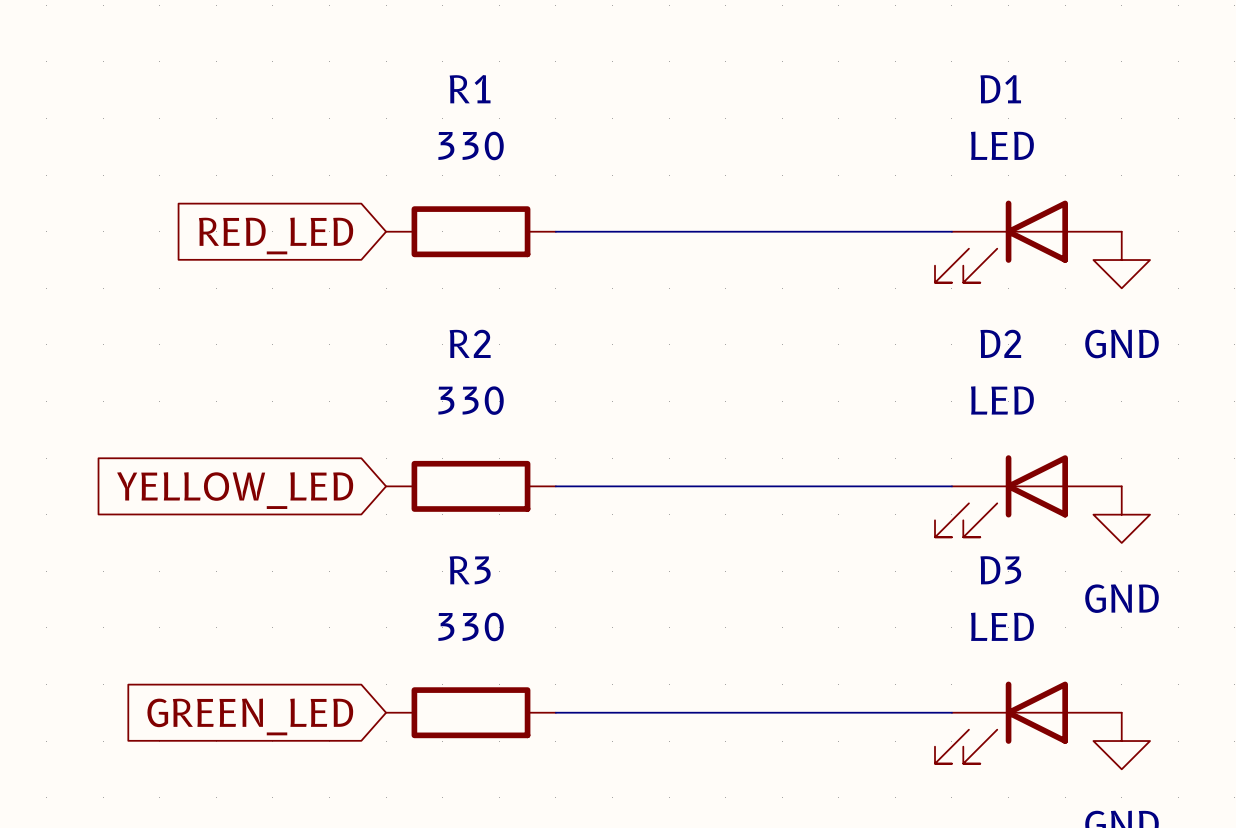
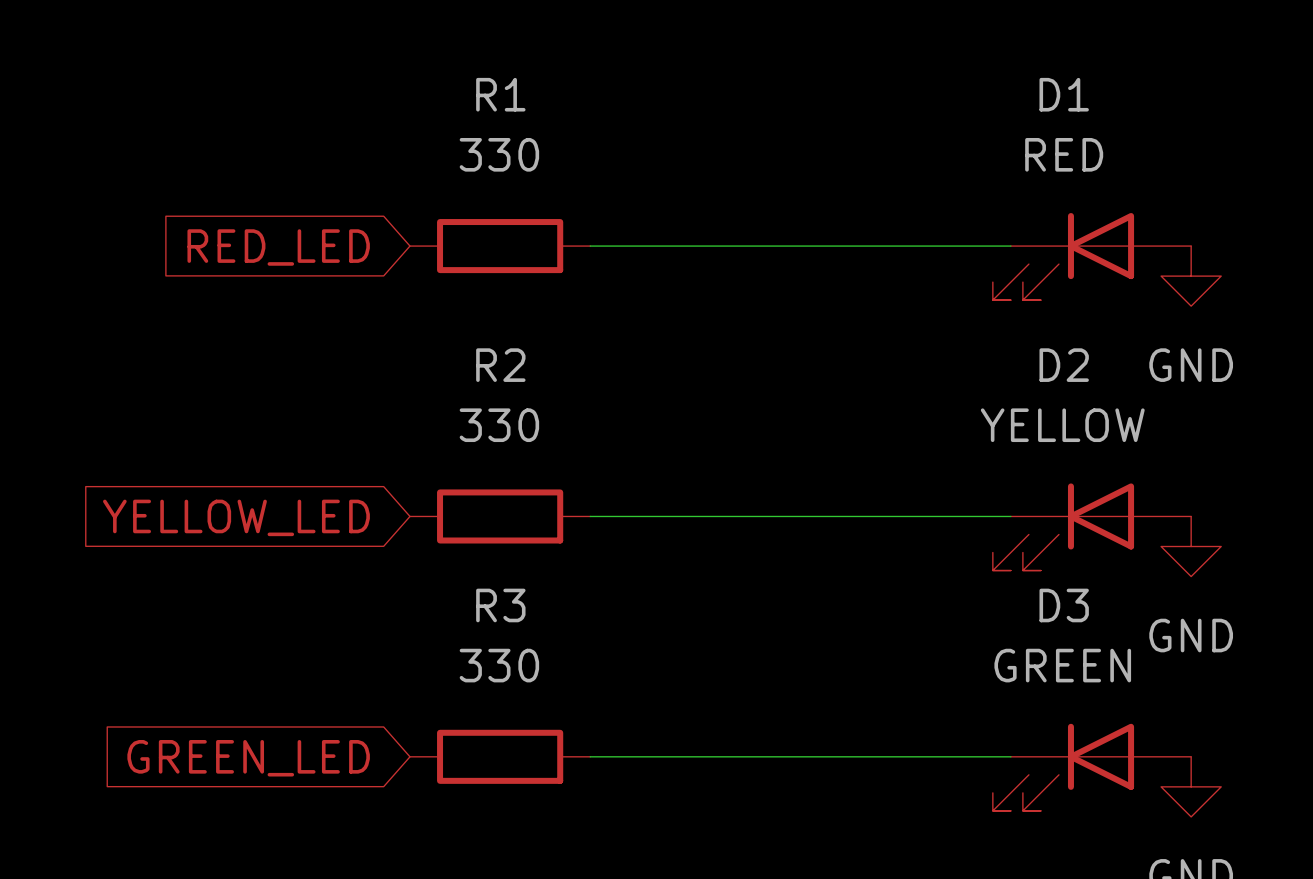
D1 value: LED (1002, 145) -> RED (1064, 154)
D2 value: LED (1002, 400) -> YELLOW (1062, 425)
D3 value: LED (1002, 626) -> GREEN (1062, 665)

